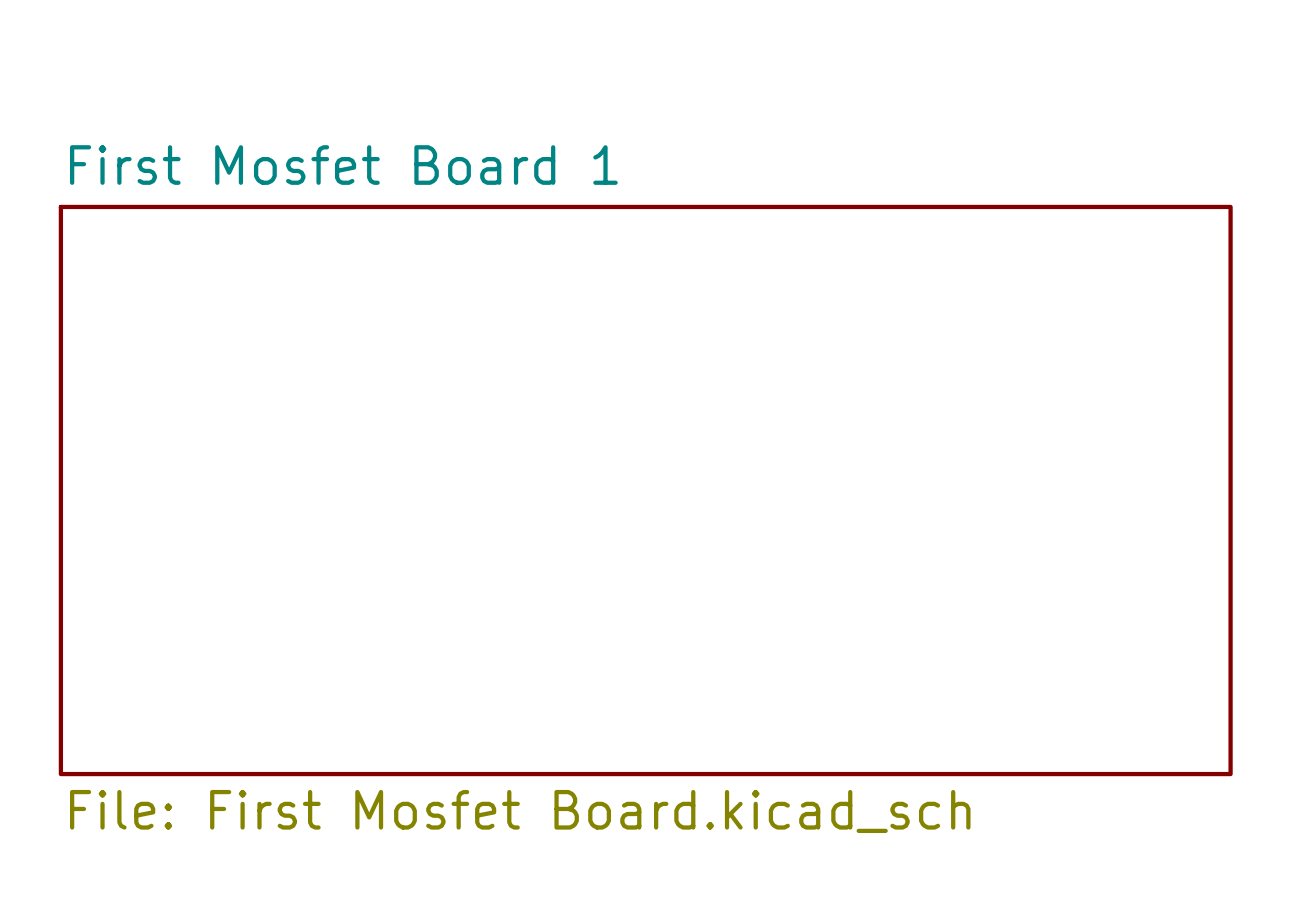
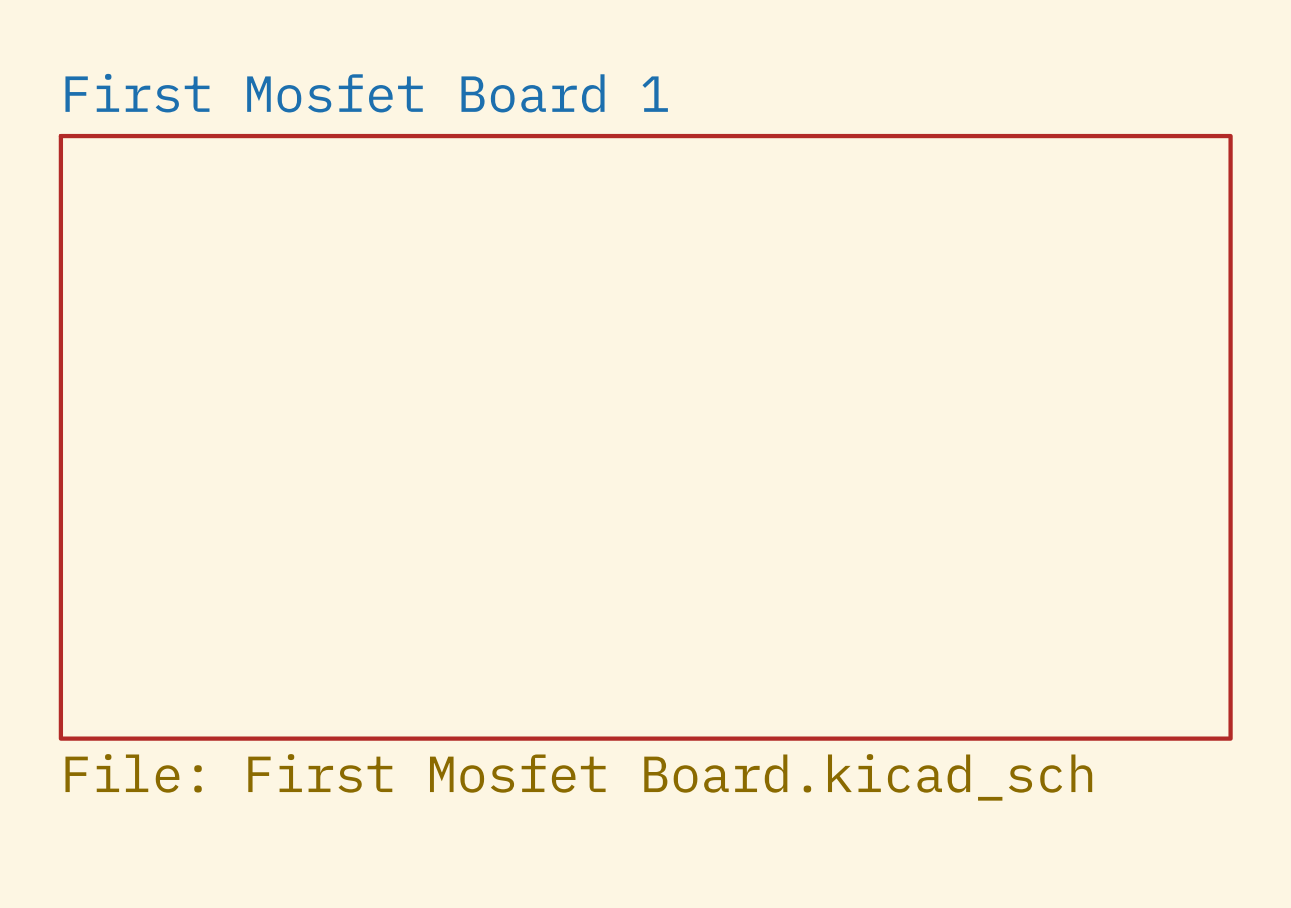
sheet First Mosfet Board 1 shape: [58, 204, 1233, 777] -> [58, 133, 1233, 741]

